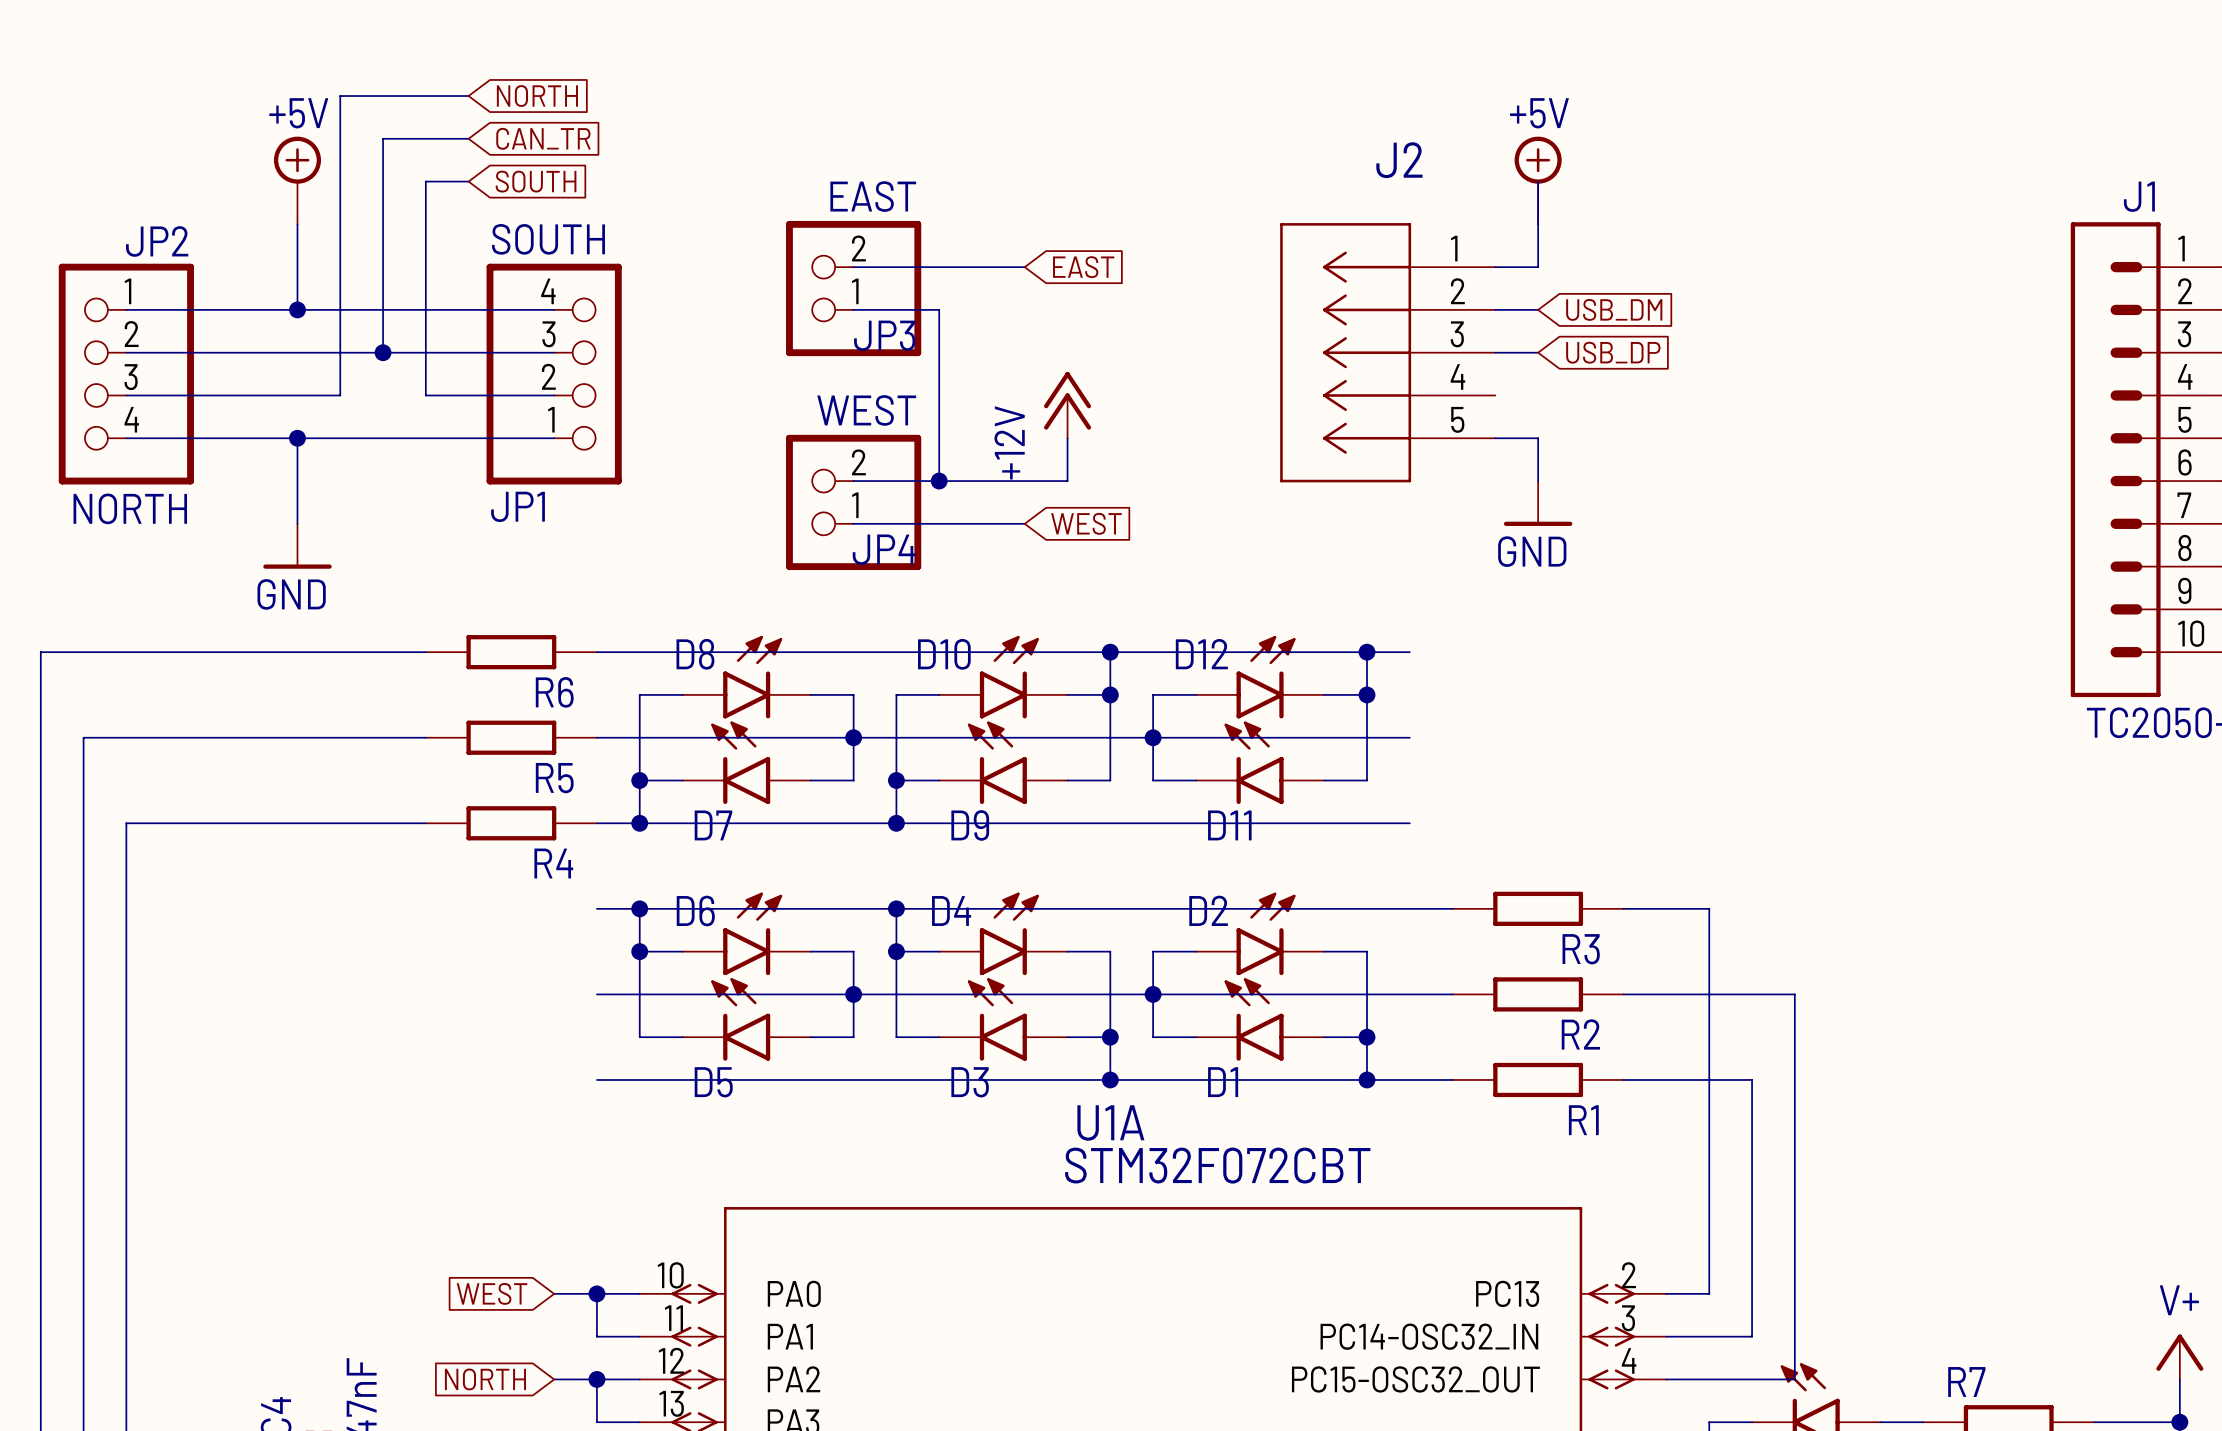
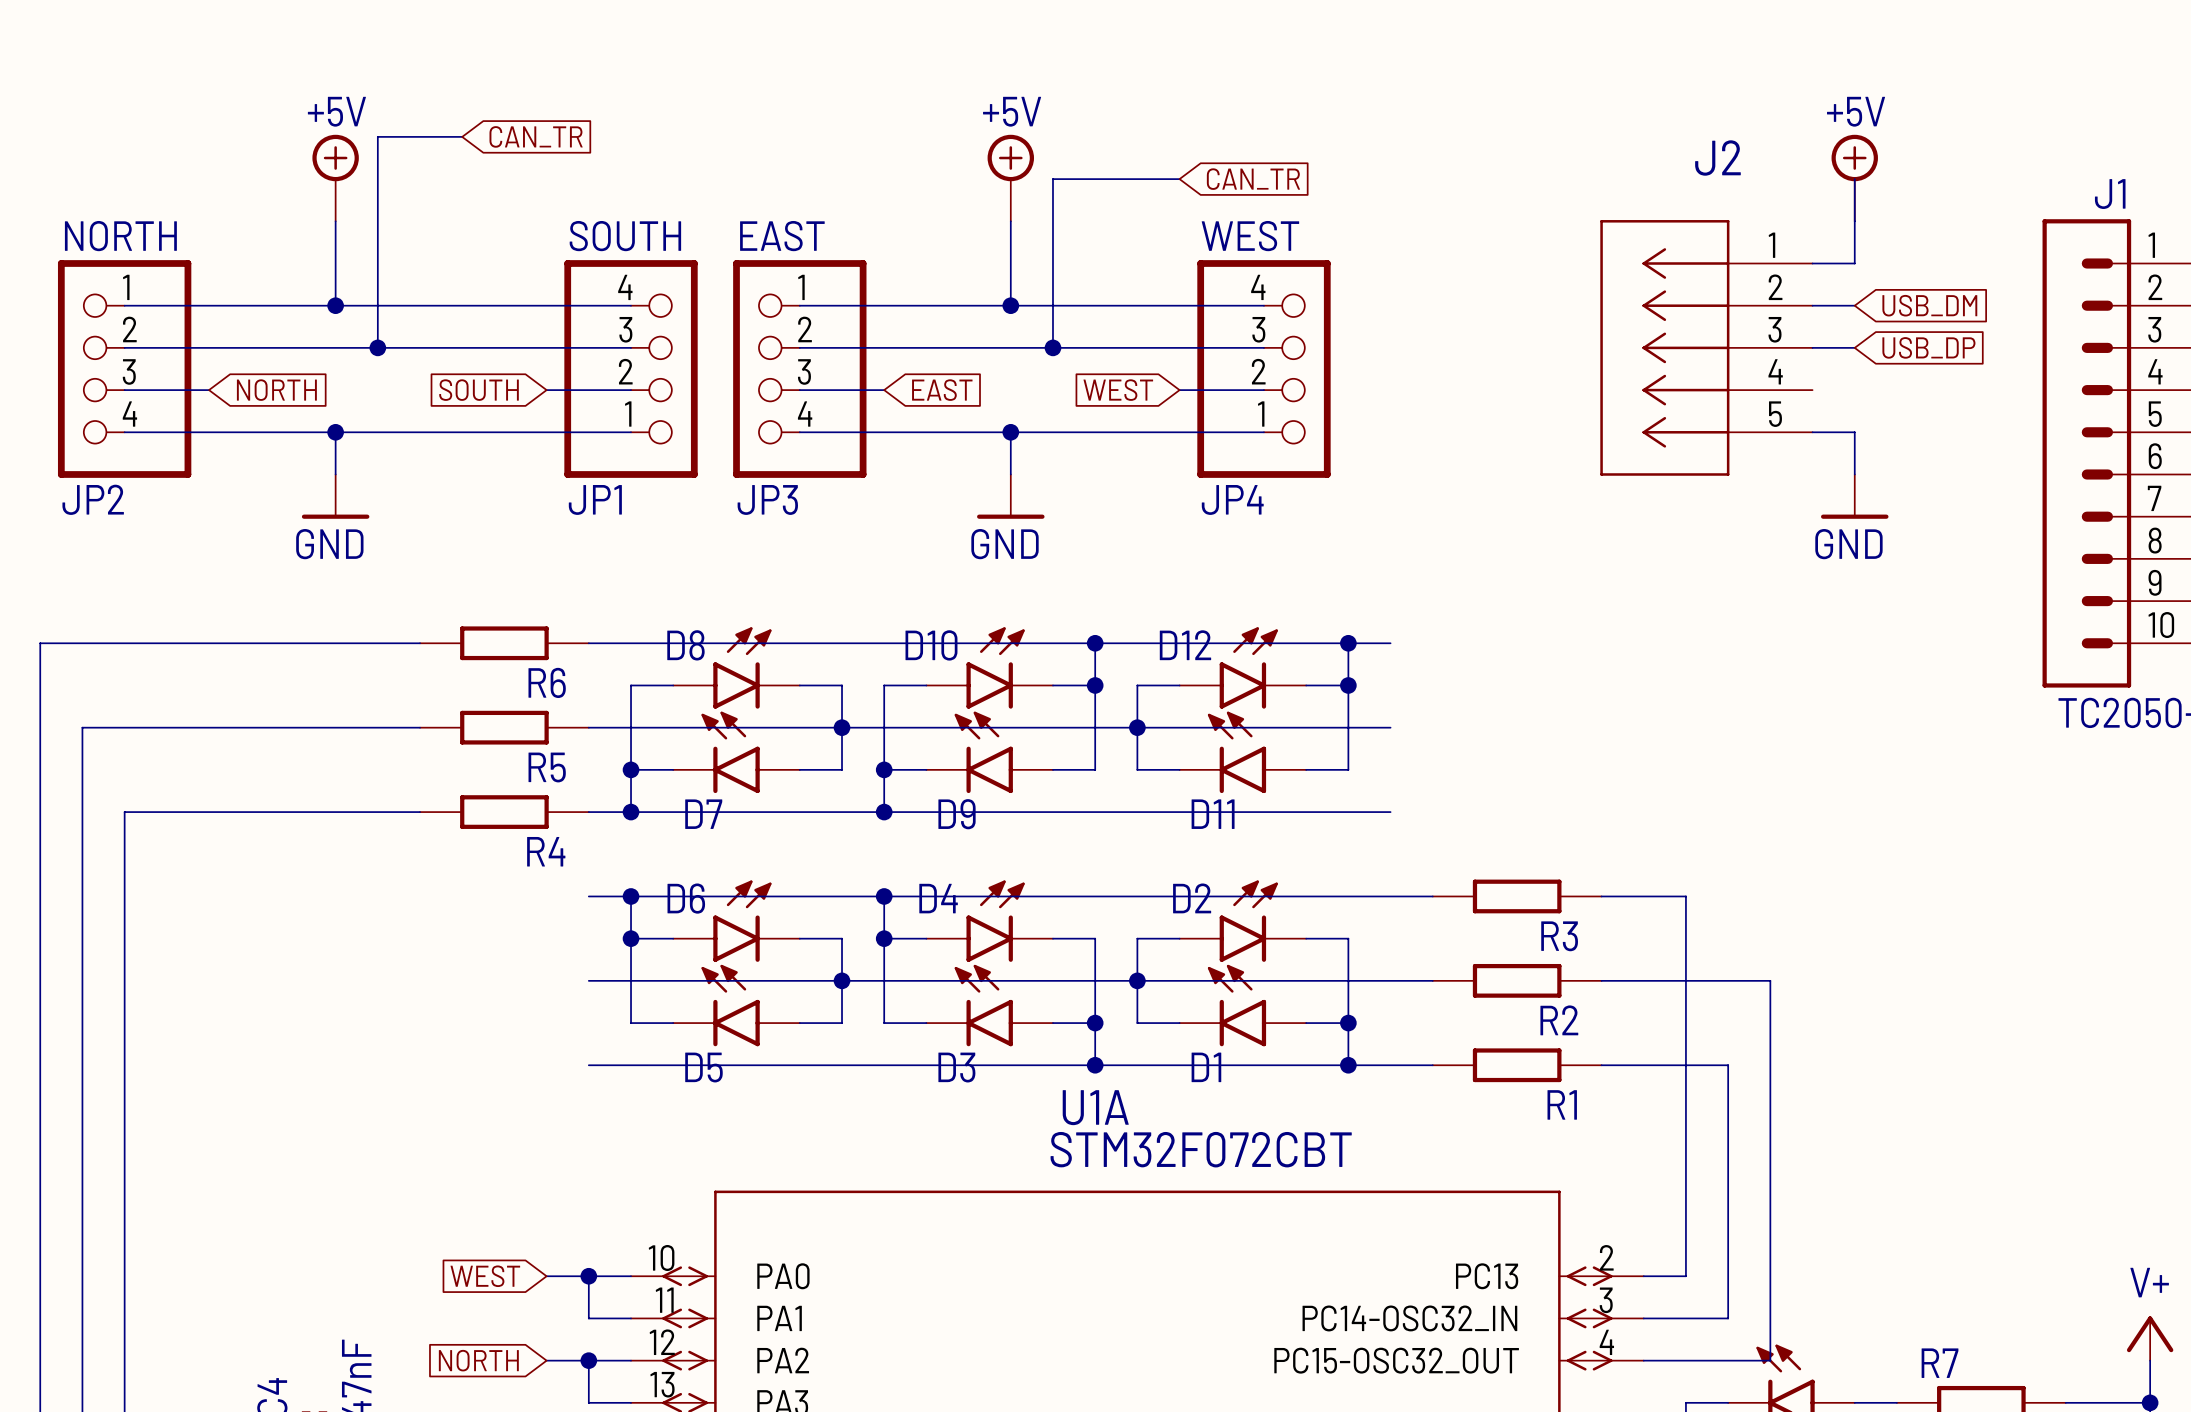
wire: (468, 96) (340, 96) (340, 224) -> none
global label position: NORTH (537, 96) -> NORTH (276, 390)
power symbol position: +5V (297, 180) -> +5V (335, 178)
power symbol: none -> +5V (1010, 178)
power symbol: +5V (1538, 180) -> none
power symbol: none -> +5V (1854, 178)
wire: (468, 181) (425, 181) (425, 395) (554, 395) -> (631, 390) (546, 390)
global label rotation: 0° (536, 181) -> 180° (479, 390)
global label position: SOUTH (536, 181) -> SOUTH (479, 390)
wire: none -> (1179, 179) (1052, 179) (1052, 347)
global label: none -> CAN_TR (1253, 179)
wire: (1538, 181) (1538, 267) (1495, 267) -> (1854, 179) (1854, 263) (1812, 263)
JP3 value position: EAST (873, 196) -> EAST (782, 236)
JP3 symbol: [786, 220, 922, 357] -> [733, 260, 867, 478]
wire: (297, 224) (297, 309) -> none
wire: none -> (1010, 221) (1010, 305)
JP2 name position: JP2 (157, 241) -> JP2 (93, 499)
wire: (853, 267) (1024, 267) -> none
global label position: EAST (1083, 267) -> EAST (942, 390)
junction position: (297, 309) -> (335, 305)
wire: (340, 309) (340, 395) (211, 395) -> none
wire: none -> (546, 305) (631, 305)
wire: none -> (799, 305) (842, 305)
wire: (939, 309) (939, 481) -> (926, 305) (1263, 305)
junction: none -> (1010, 305)
wire: (1495, 309) (1538, 309) -> (1812, 305) (1854, 305)
global label position: USB_DM (1614, 309) -> USB_DM (1929, 305)
JP3 name position: JP3 (884, 335) -> JP3 (767, 499)
wire: none -> (546, 347) (631, 347)
wire: none -> (799, 347) (1263, 347)
junction: none -> (1052, 347)
J2 position: (1387, 352) -> (1706, 347)
wire: (1495, 352) (1538, 352) -> (1812, 347) (1854, 347)
global label position: USB_DP (1613, 352) -> USB_DP (1928, 347)
JP1 position: (554, 374) -> (631, 368)
wire: none -> (799, 390) (884, 390)
wire: none -> (1179, 390) (1263, 390)
power symbol: +12V (1067, 405) -> none
JP4 value position: WEST (866, 410) -> WEST (1250, 236)
JP4 symbol: [786, 434, 922, 571] -> [1197, 260, 1331, 478]
wire: (297, 438) (297, 523) -> none
junction position: (297, 438) -> (335, 432)
wire: none -> (335, 432) (335, 474)
wire: none -> (546, 432) (631, 432)
wire: none -> (799, 432) (1263, 432)
wire: none -> (1010, 432) (1010, 474)
junction: none -> (1010, 432)
wire: (1067, 438) (1067, 481) (853, 481) -> none
wire: (1495, 438) (1538, 438) (1538, 481) -> (1812, 432) (1854, 432) (1854, 474)
junction: (939, 481) -> none
power symbol: none -> GND (1010, 496)
power symbol: GND (1538, 503) -> none
power symbol: none -> GND (1854, 496)
JP2 value position: NORTH (130, 508) -> NORTH (120, 236)
wire: (853, 523) (1024, 523) -> none
global label rotation: 0° (1086, 523) -> 180° (1118, 390)
power symbol position: GND (297, 546) -> GND (335, 496)
JP4 name position: JP4 (884, 549) -> JP4 (1232, 499)

